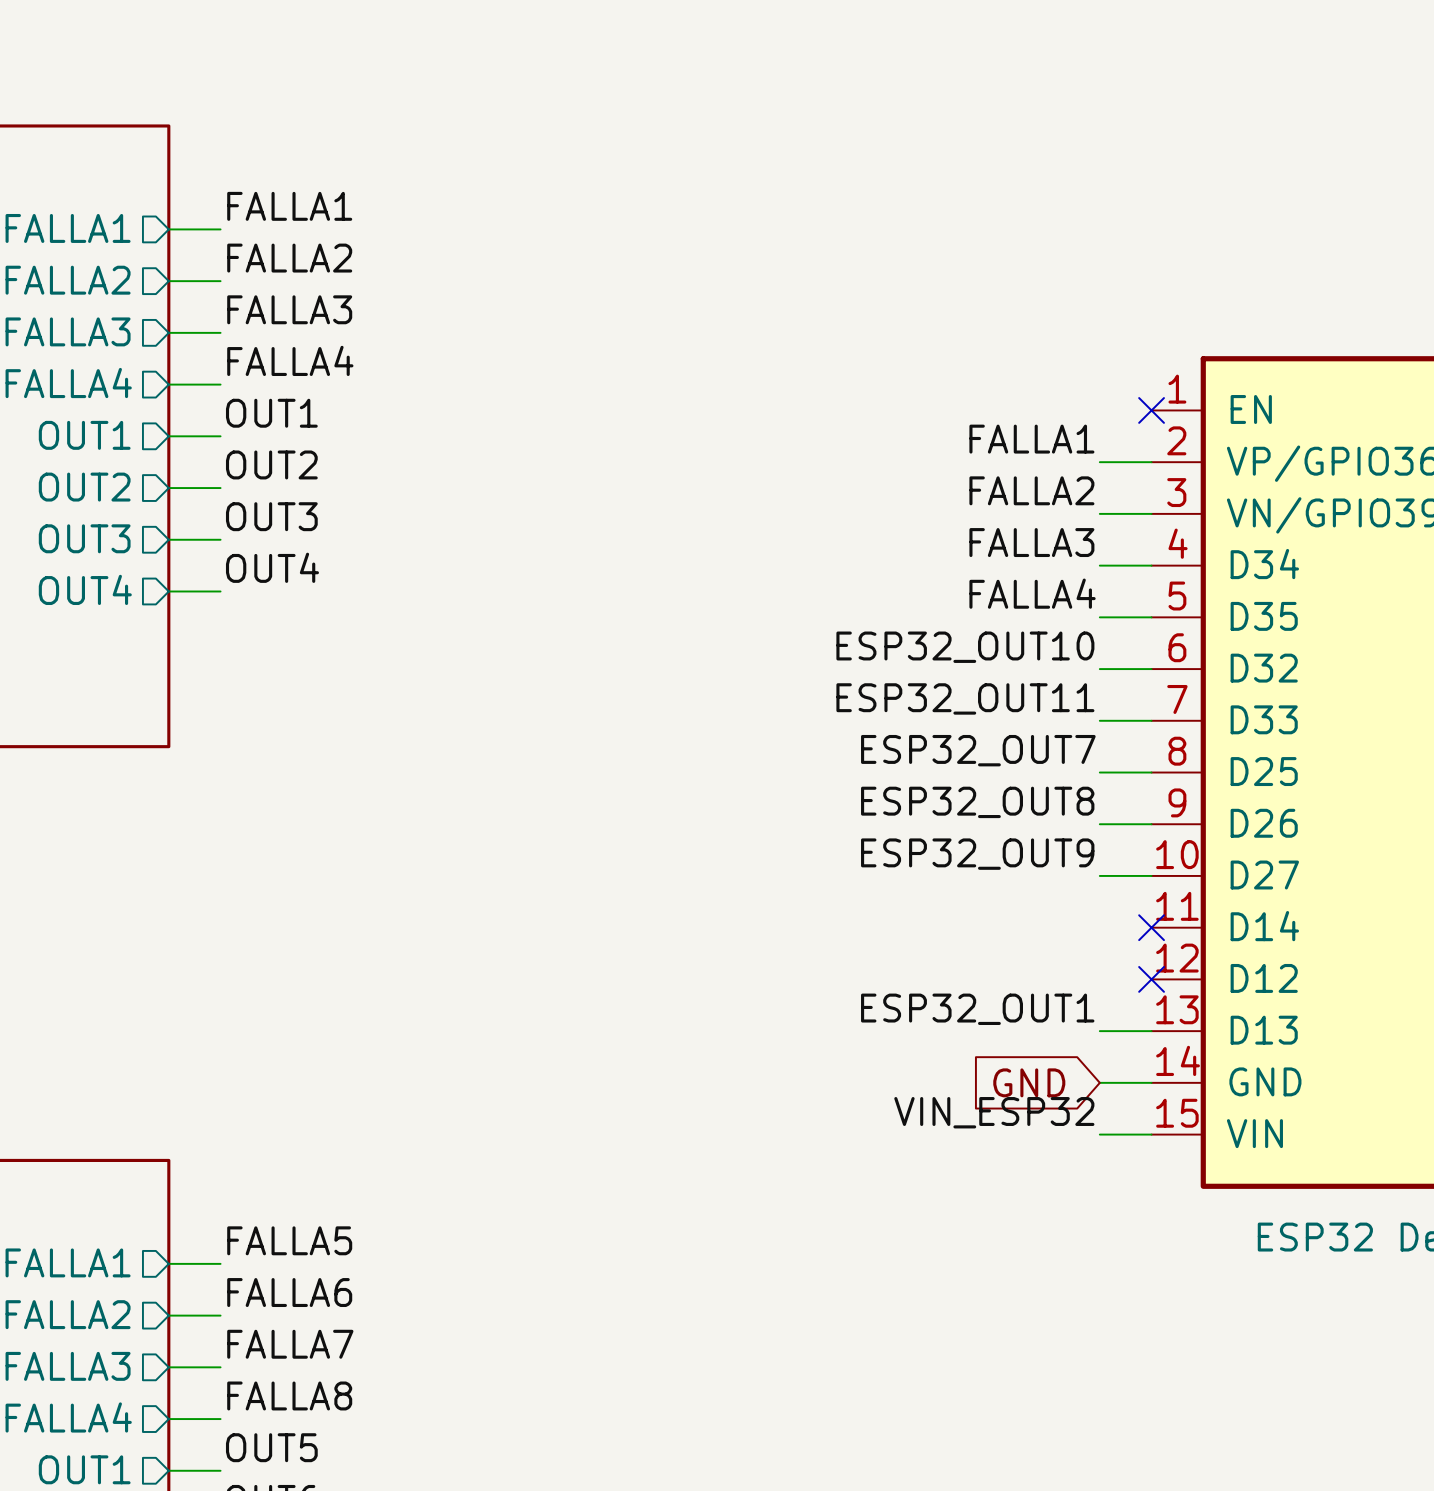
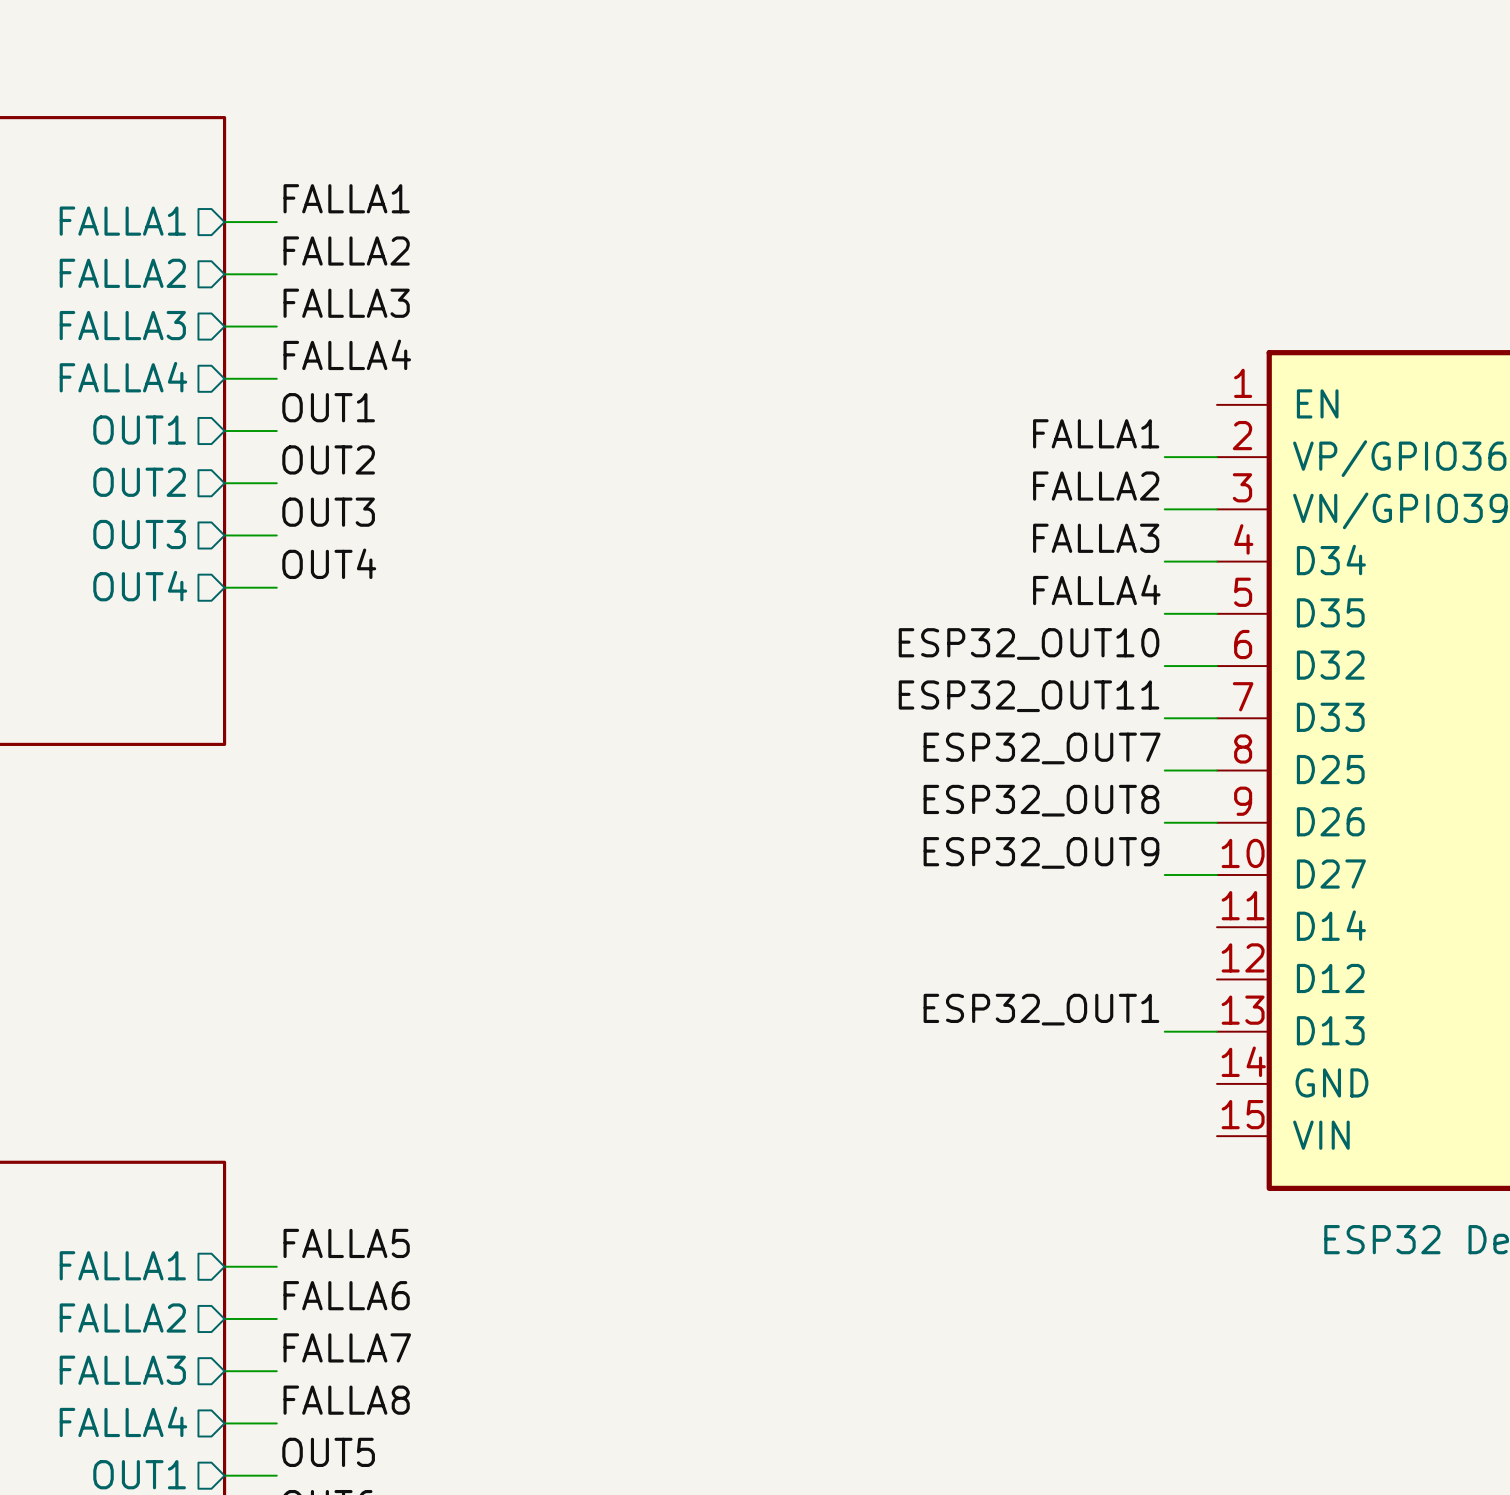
no-connect mark: (1151, 410) -> none
no-connect mark: (1151, 927) -> none
no-connect mark: (1151, 979) -> none
global label: GND (1029, 1082) -> none
wire: (1099, 1082) (1151, 1082) -> none
label: VIN_ESP32 (994, 1112) -> none
wire: (1099, 1134) (1151, 1134) -> none

